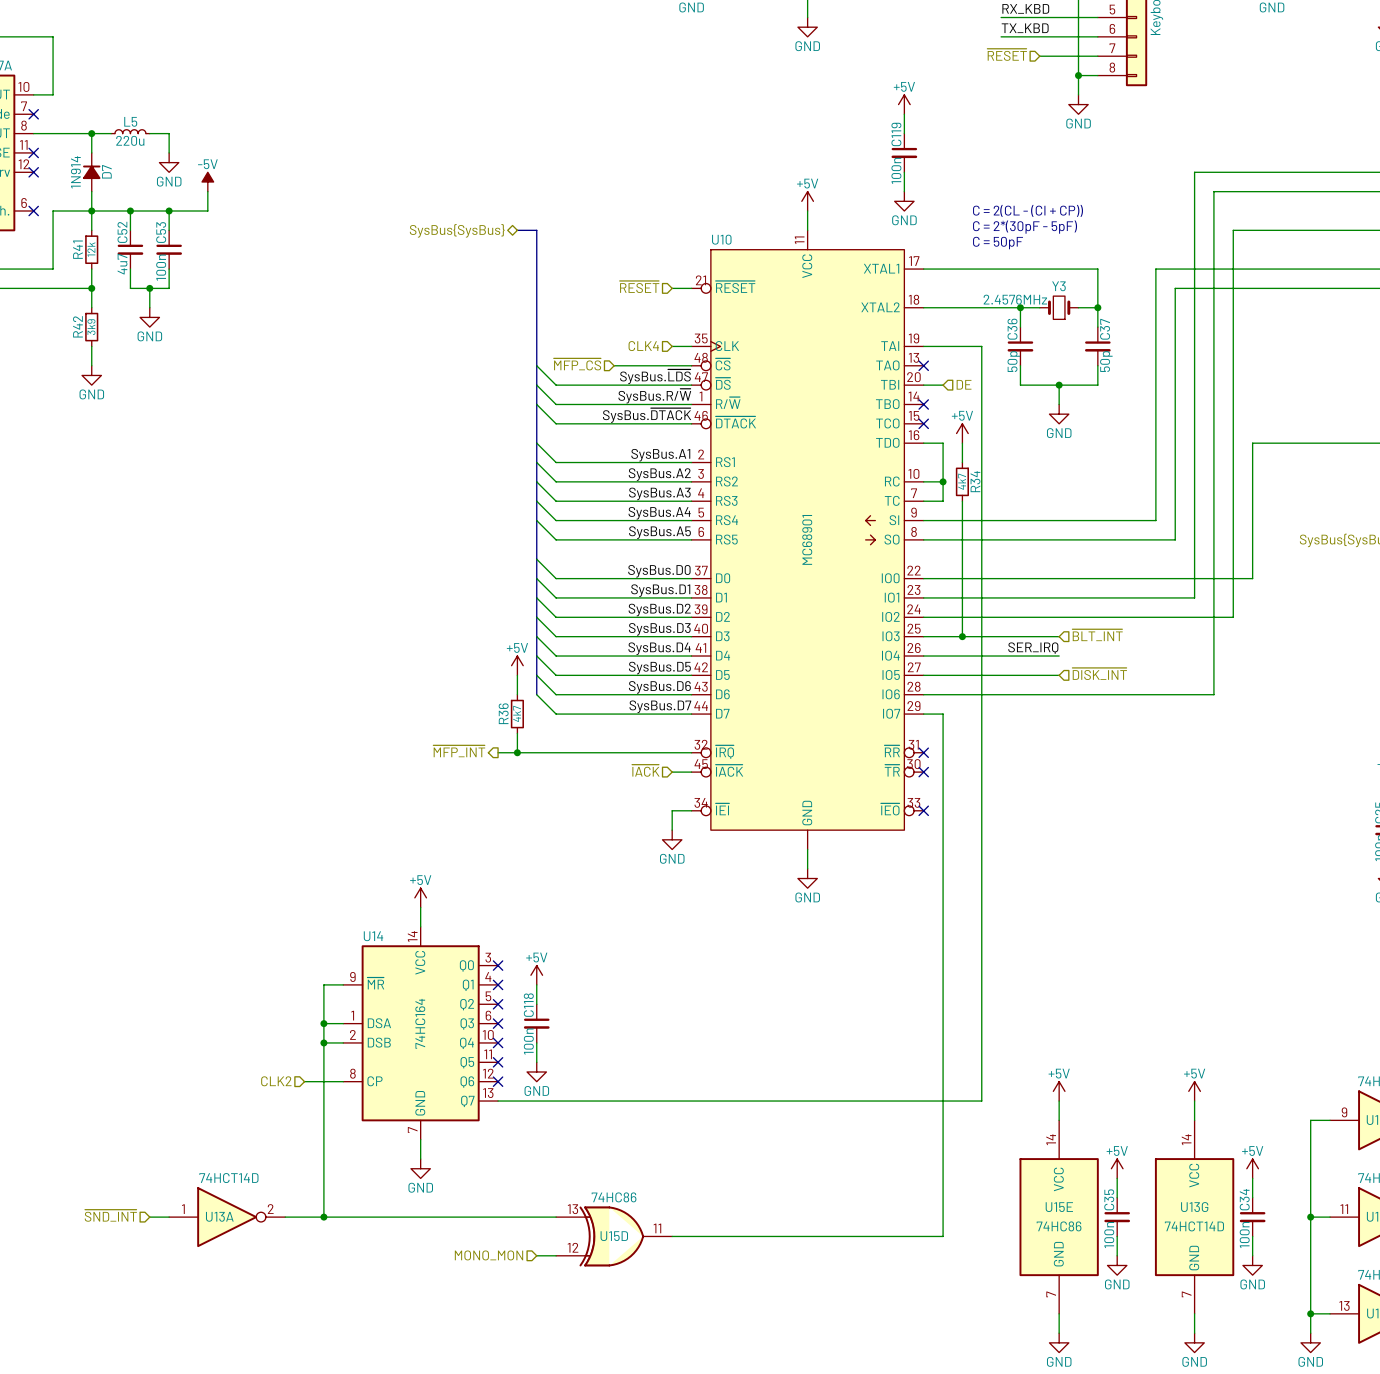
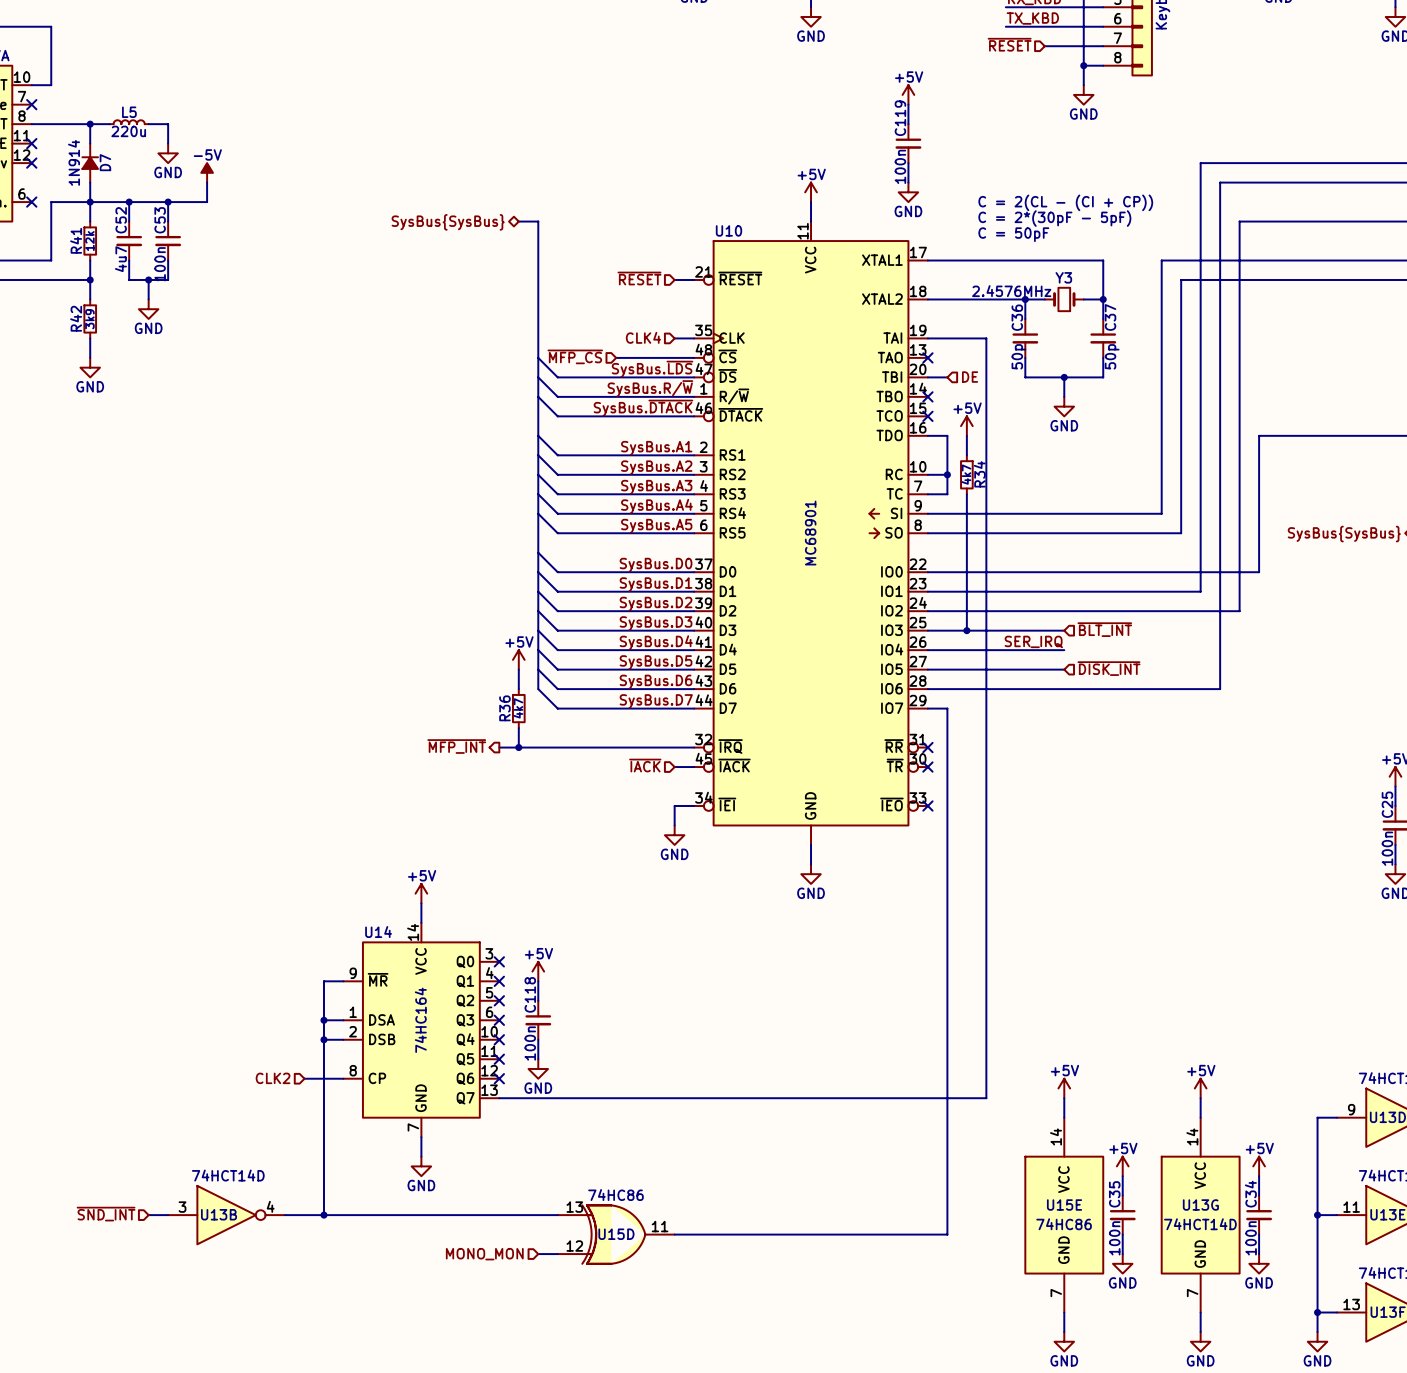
U13A pin number: 1 (183, 1209) -> 3 (182, 1207)
U13A pin number: 2 (270, 1209) -> 4 (270, 1206)
U13A name: U13A (219, 1216) -> U13B (219, 1214)

